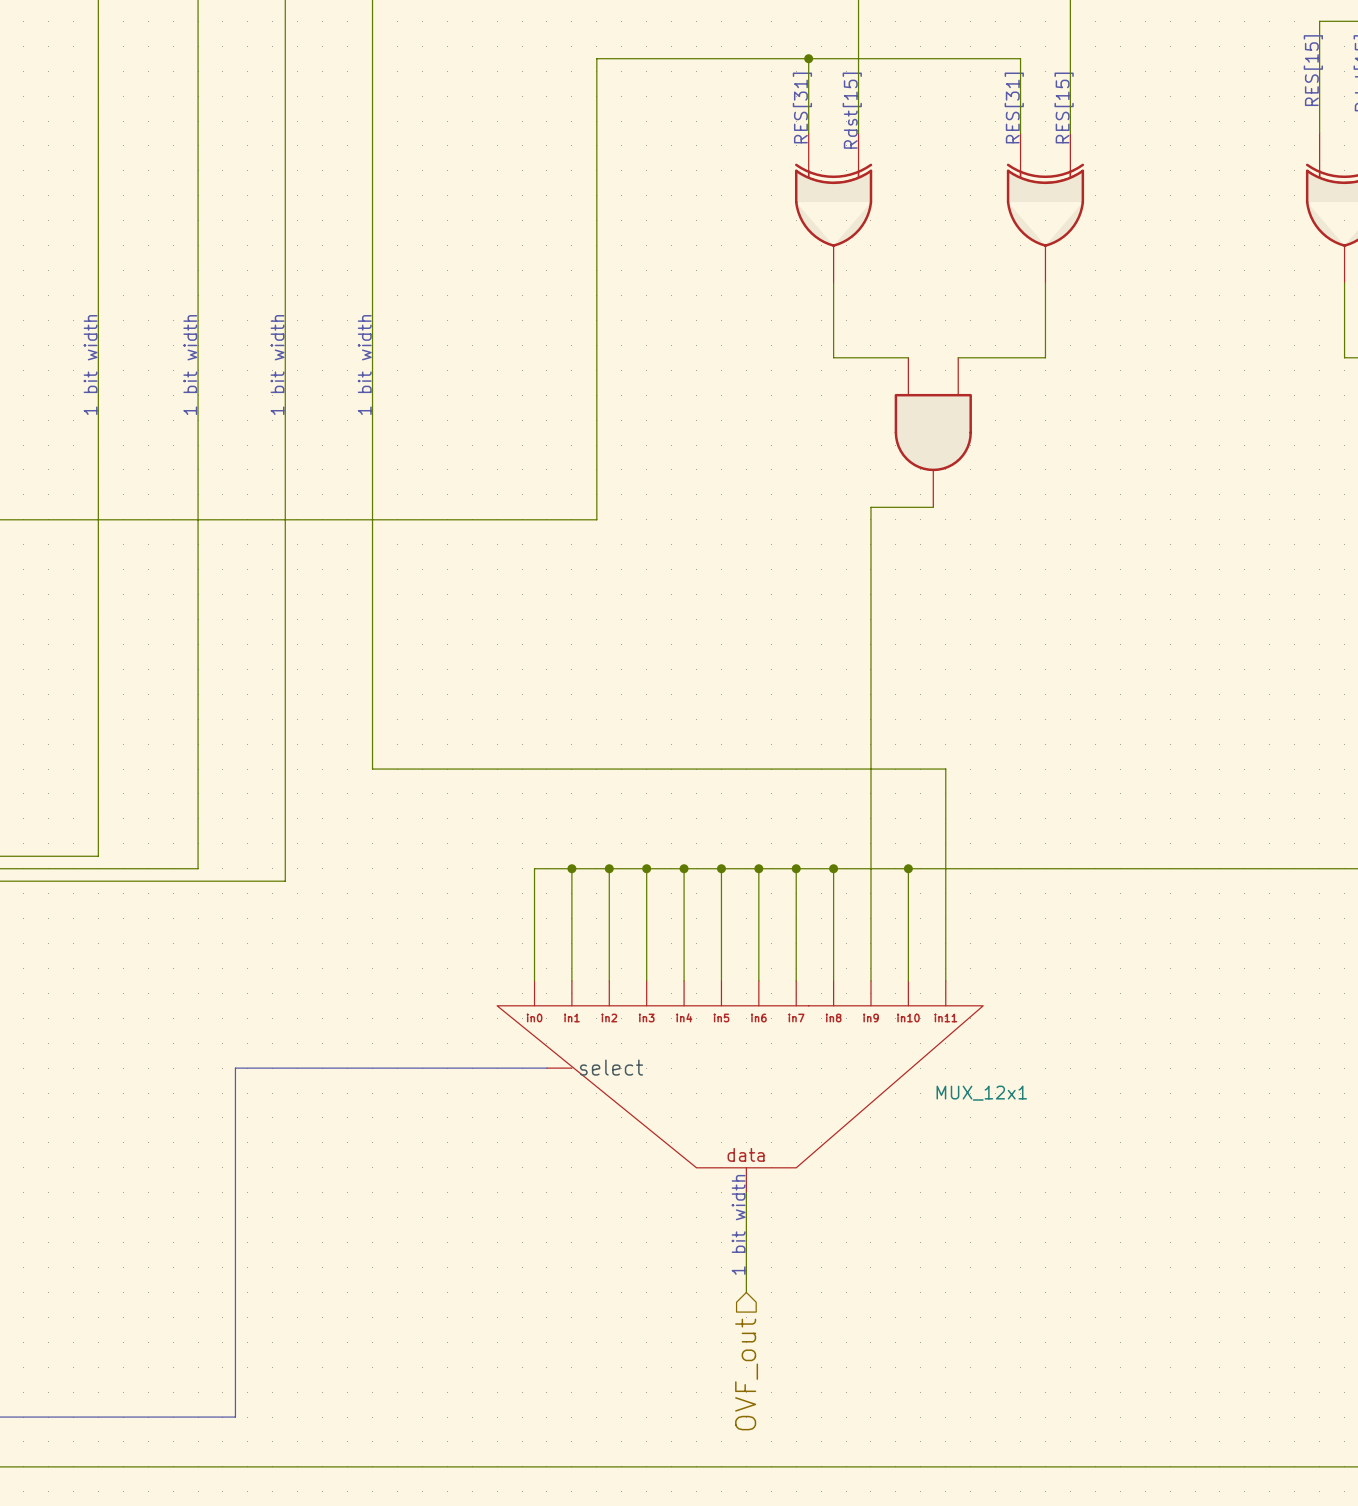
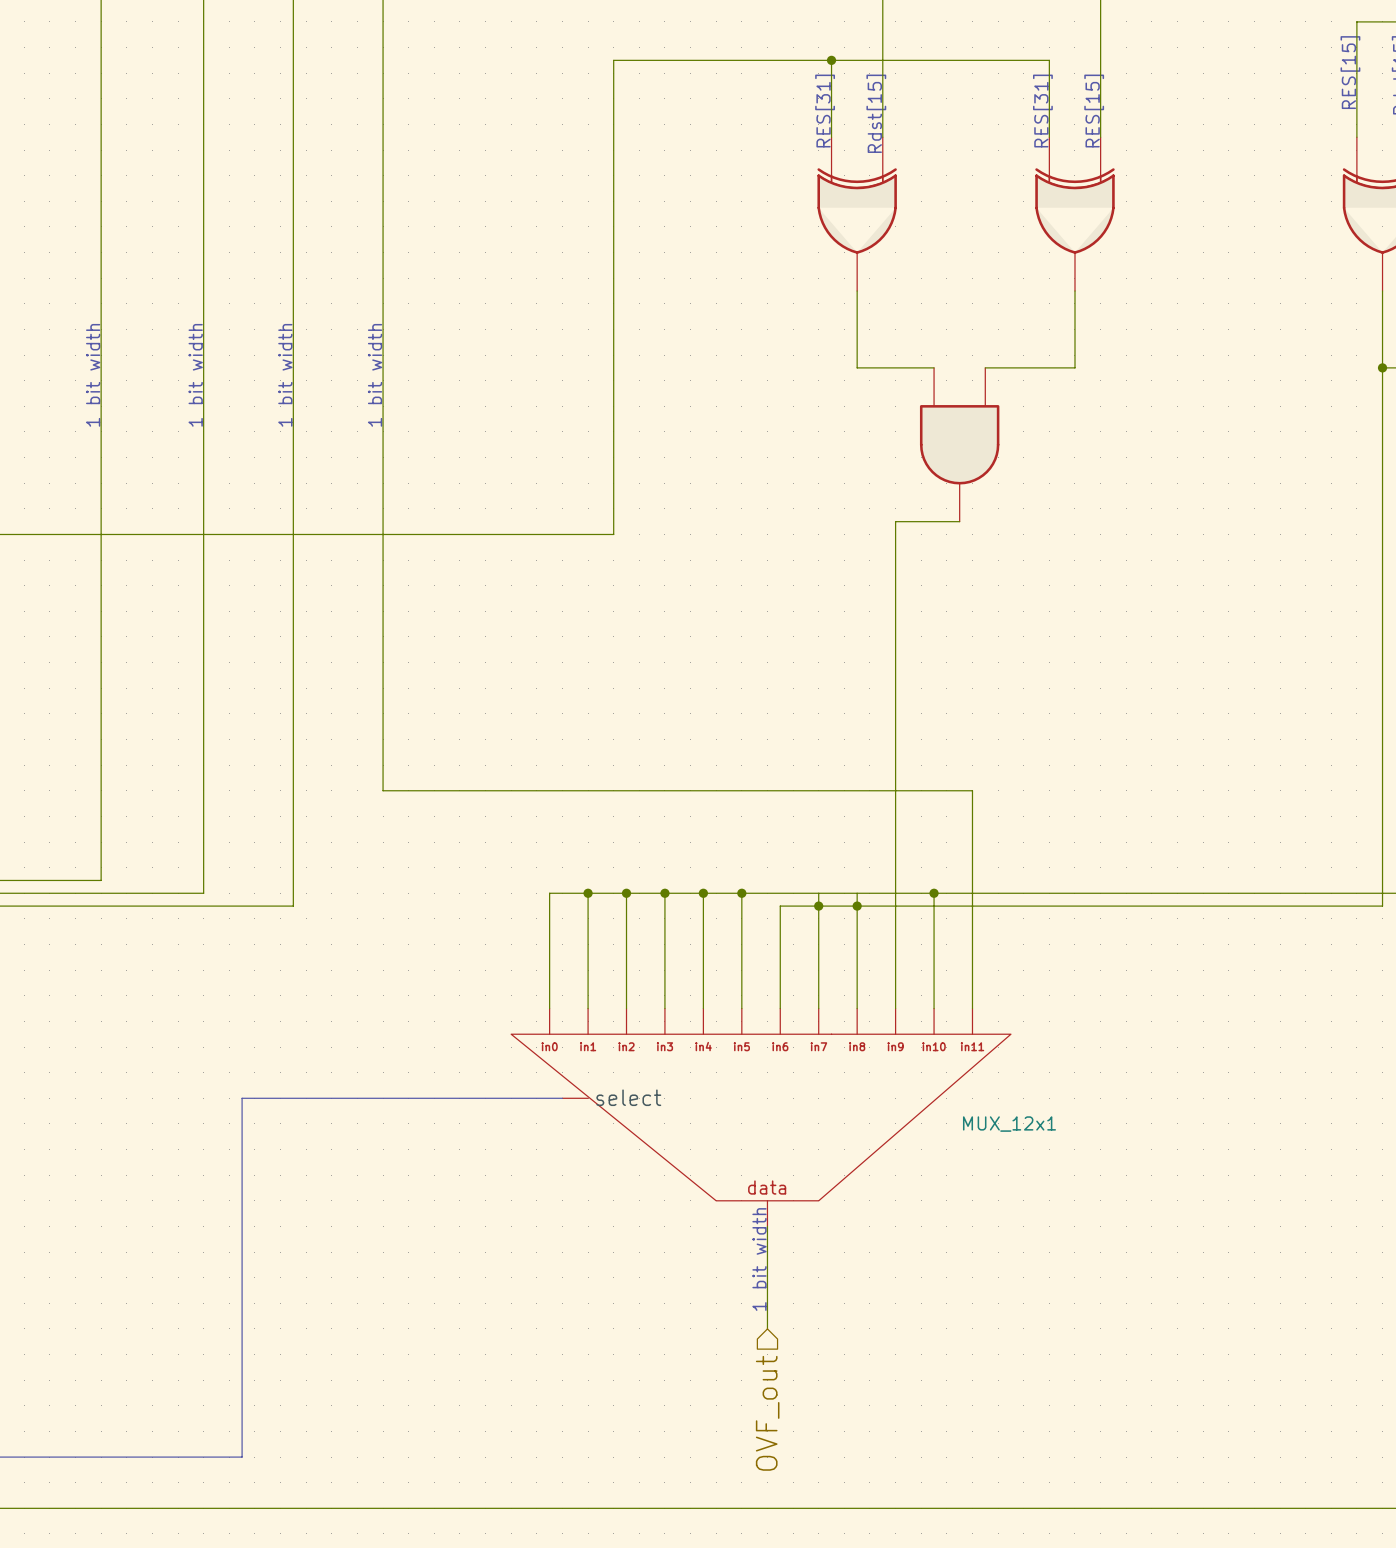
junction: none -> (1382, 367)
wire: (758, 868) (758, 881) -> (1382, 367) (1382, 906) (780, 906)
junction: (758, 868) -> none
junction position: (796, 868) -> (818, 906)
junction position: (833, 868) -> (857, 906)

